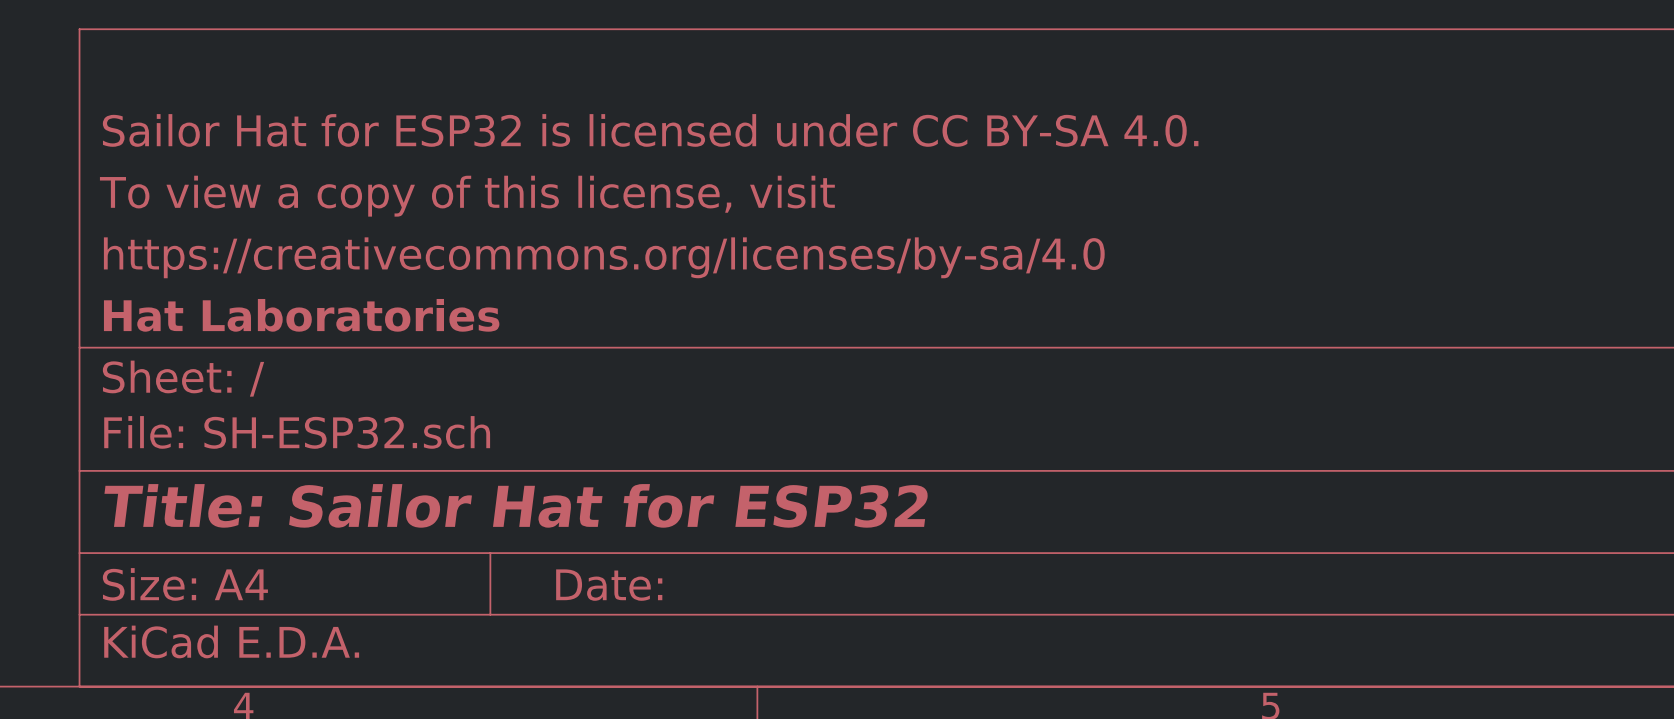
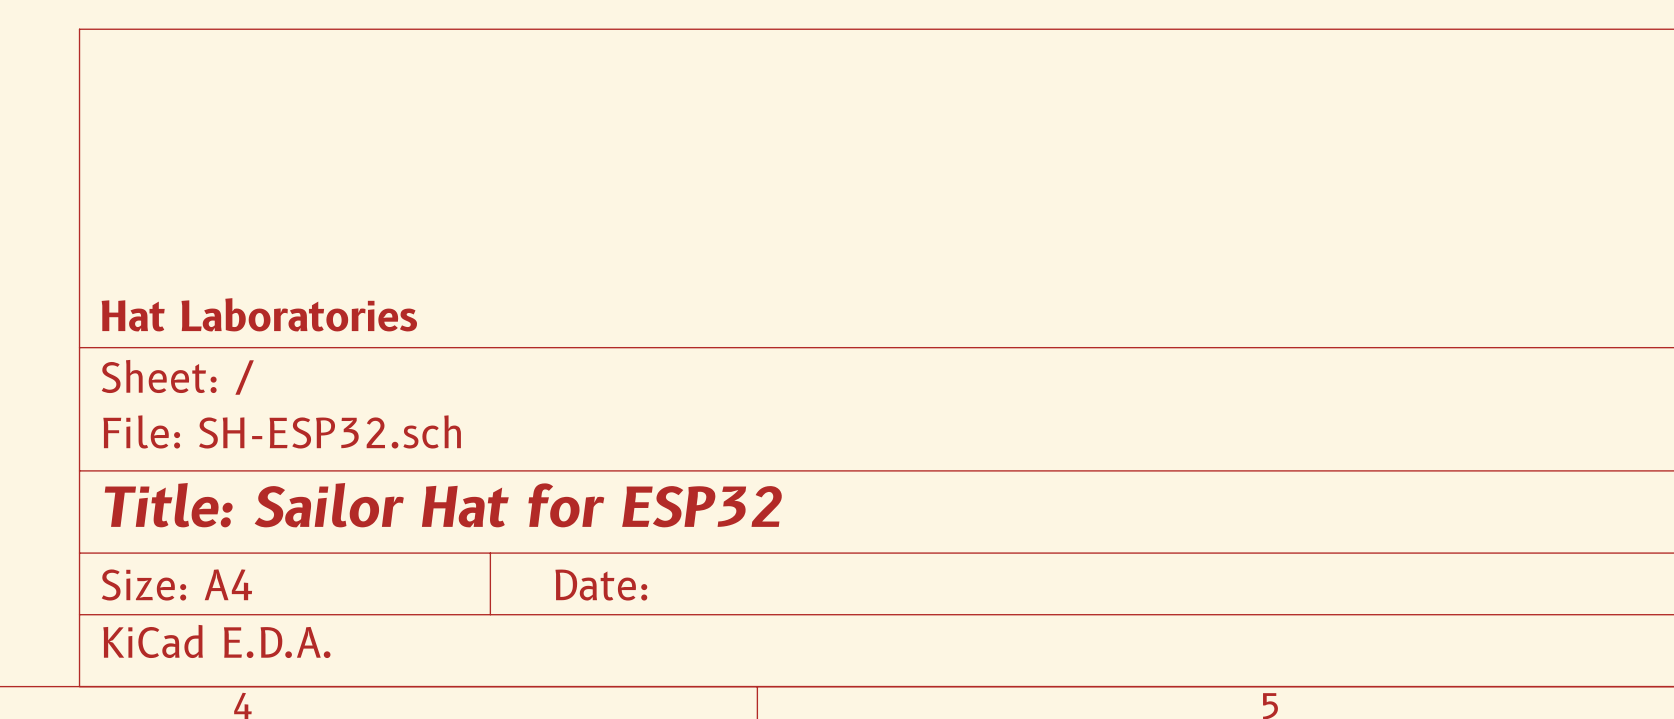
title block: Sailor Hat for ESP32 is licensed under CC BY-SA 4.0. (650, 130) -> none
title block: To view a copy of this license, visit (467, 196) -> none
title block: https://creativecommons.org/licenses/by-sa/4.0 (604, 257) -> none

